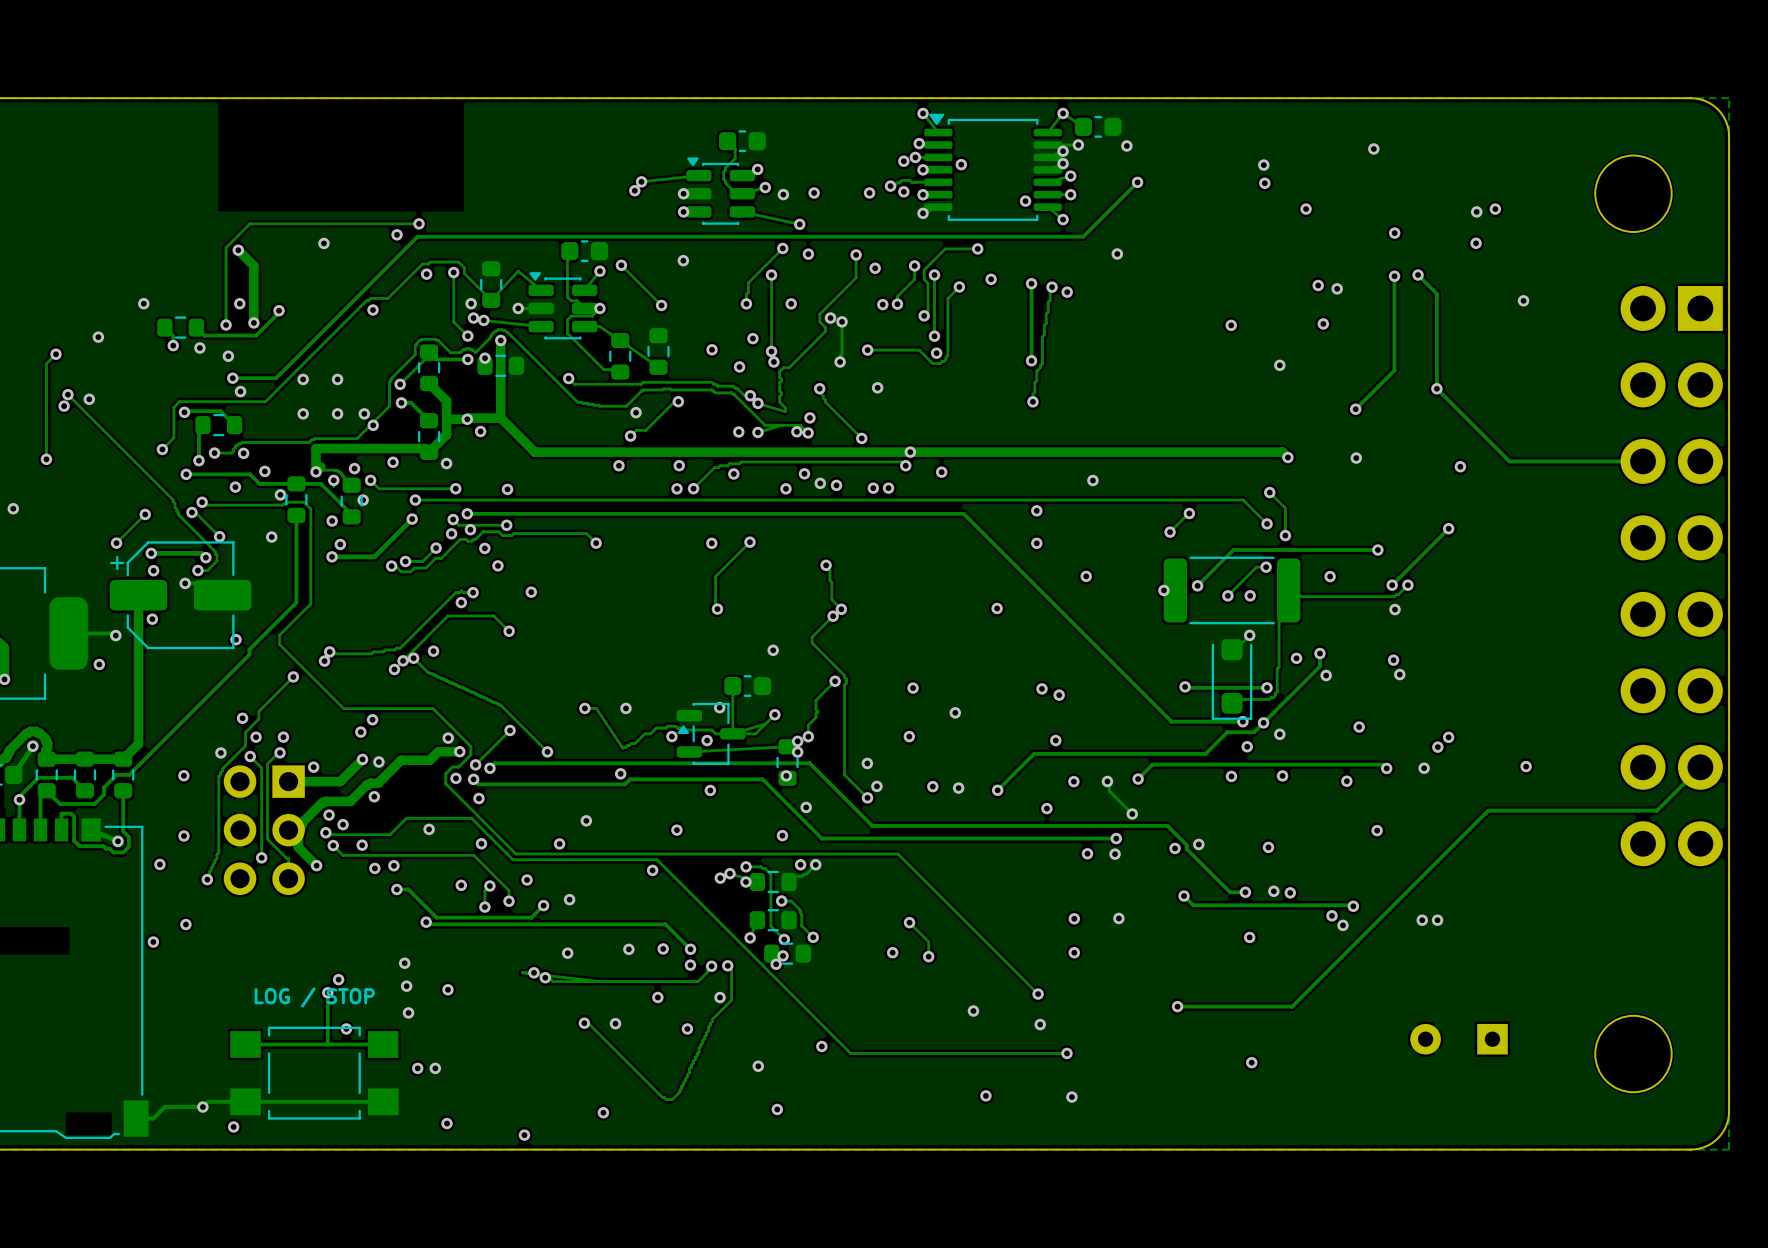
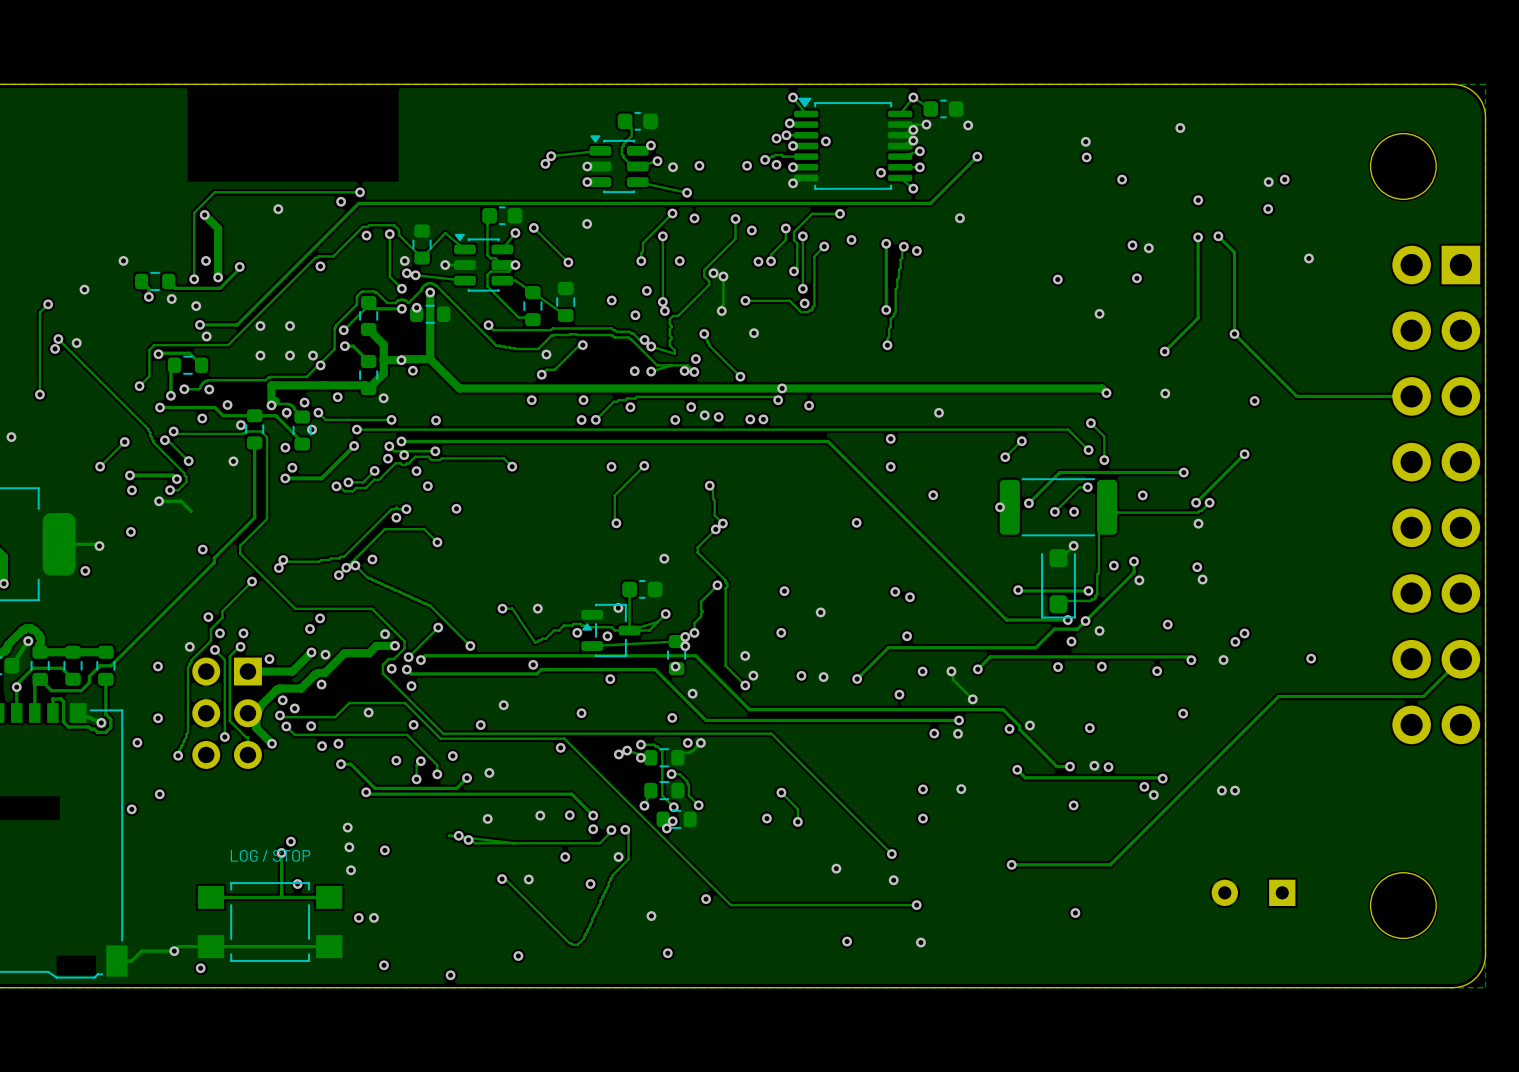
track: (138, 595) (138, 743) (123, 759) -> none
part: (180, 595) -> none

